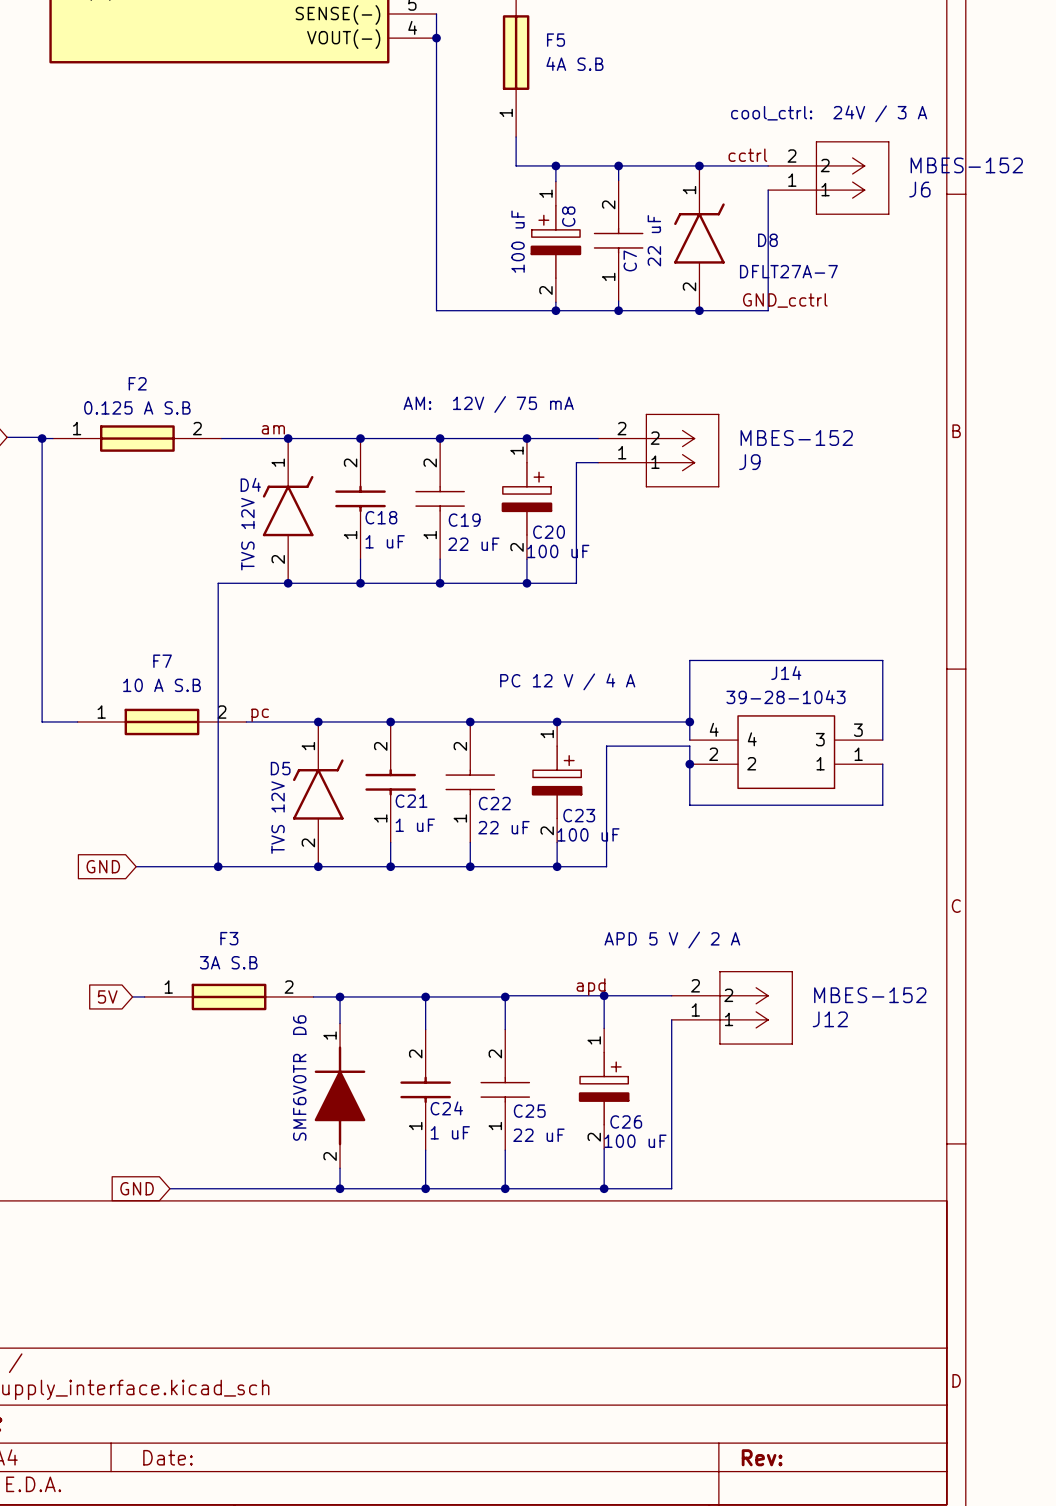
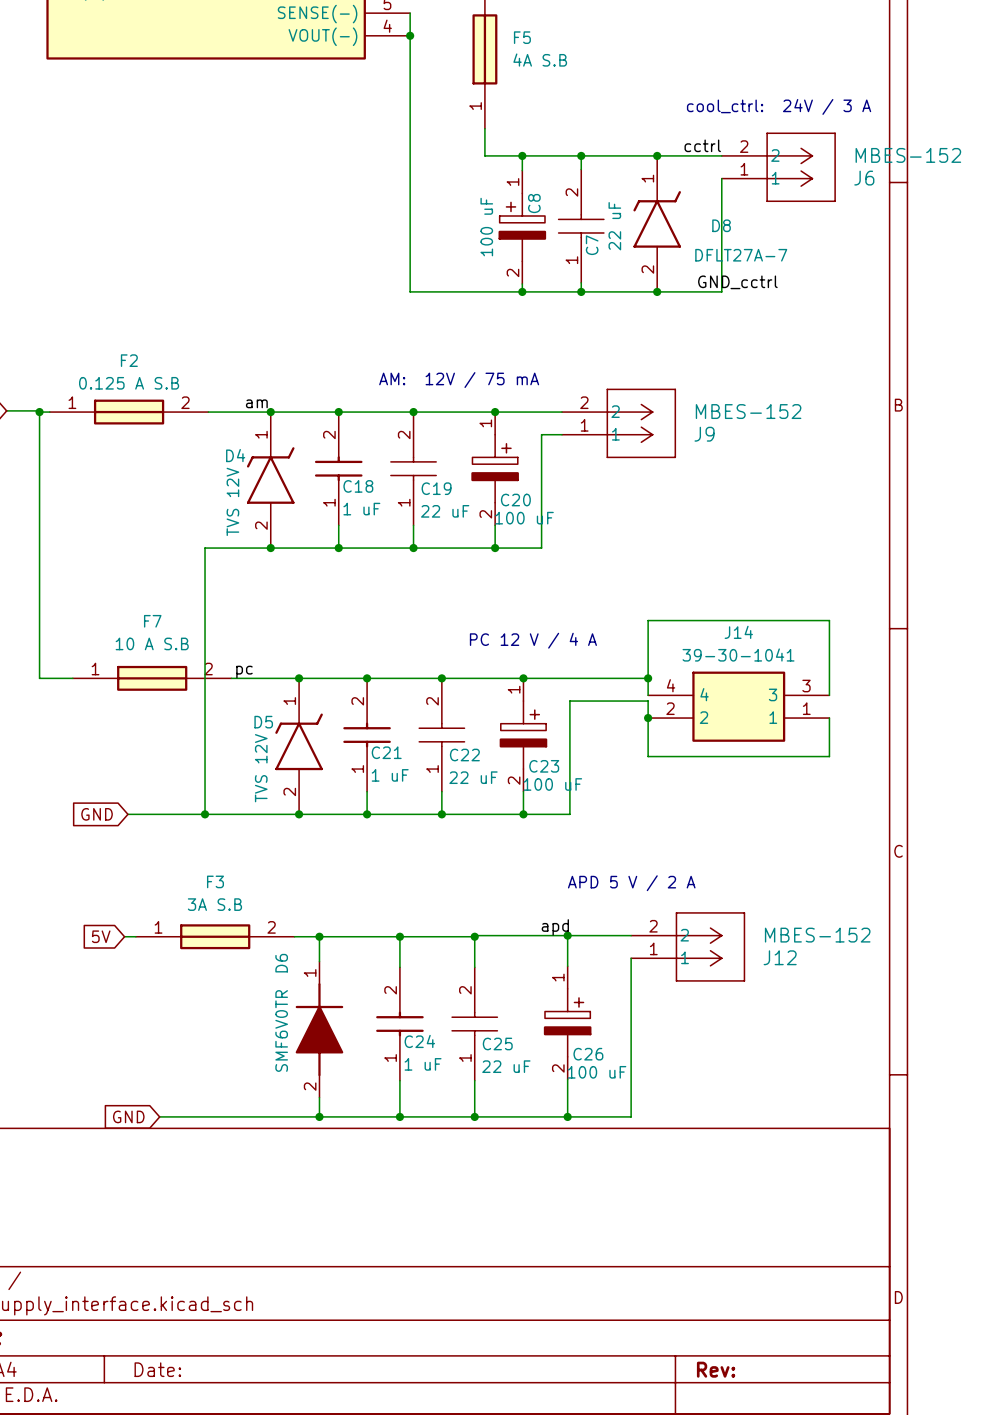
J14 value: 39-28-1043 (785, 697) -> 39-30-1041 (738, 655)
J14 symbol: [689, 715, 883, 790] -> [648, 671, 830, 742]

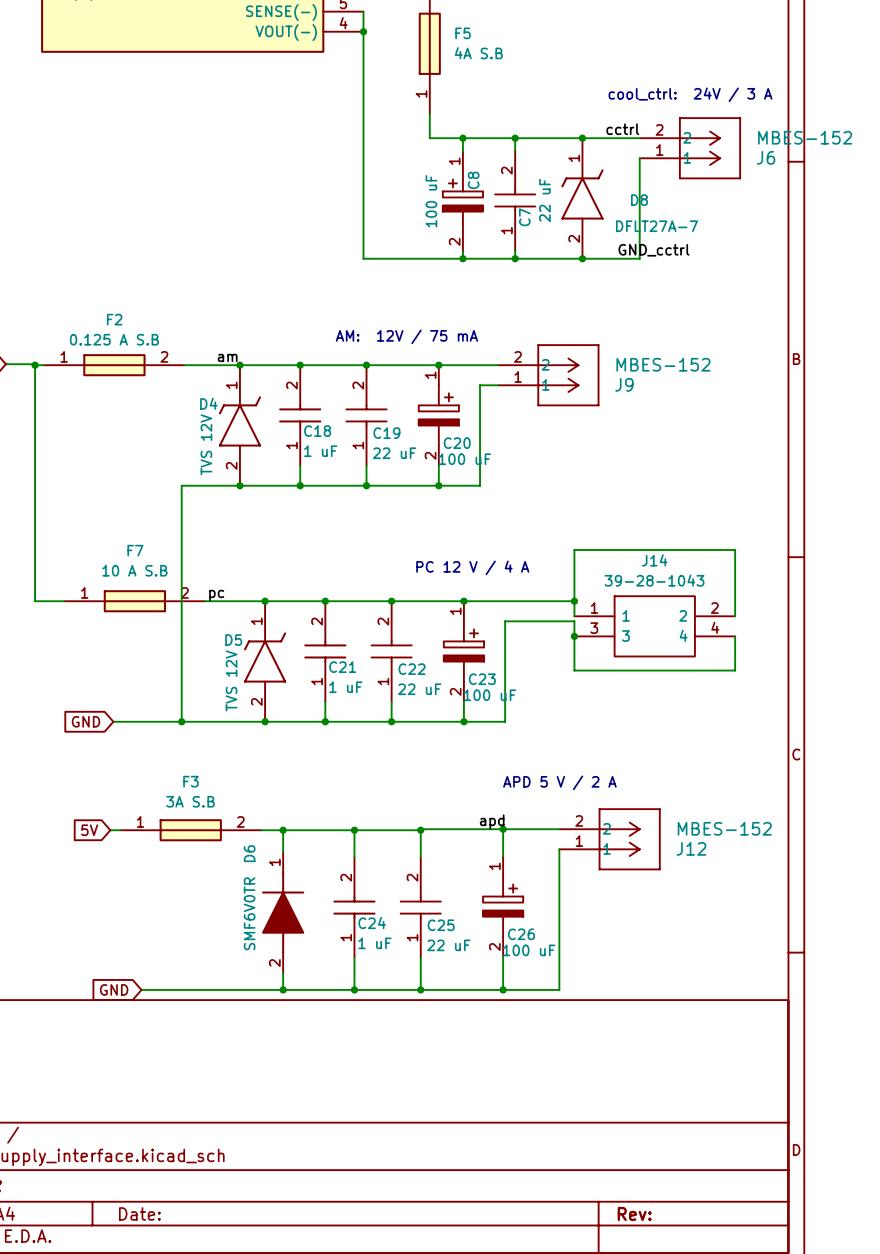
J14 value: 39-30-1041 (738, 655) -> 39-28-1043 (654, 580)
J14 symbol: [648, 671, 830, 742] -> [574, 595, 736, 658]

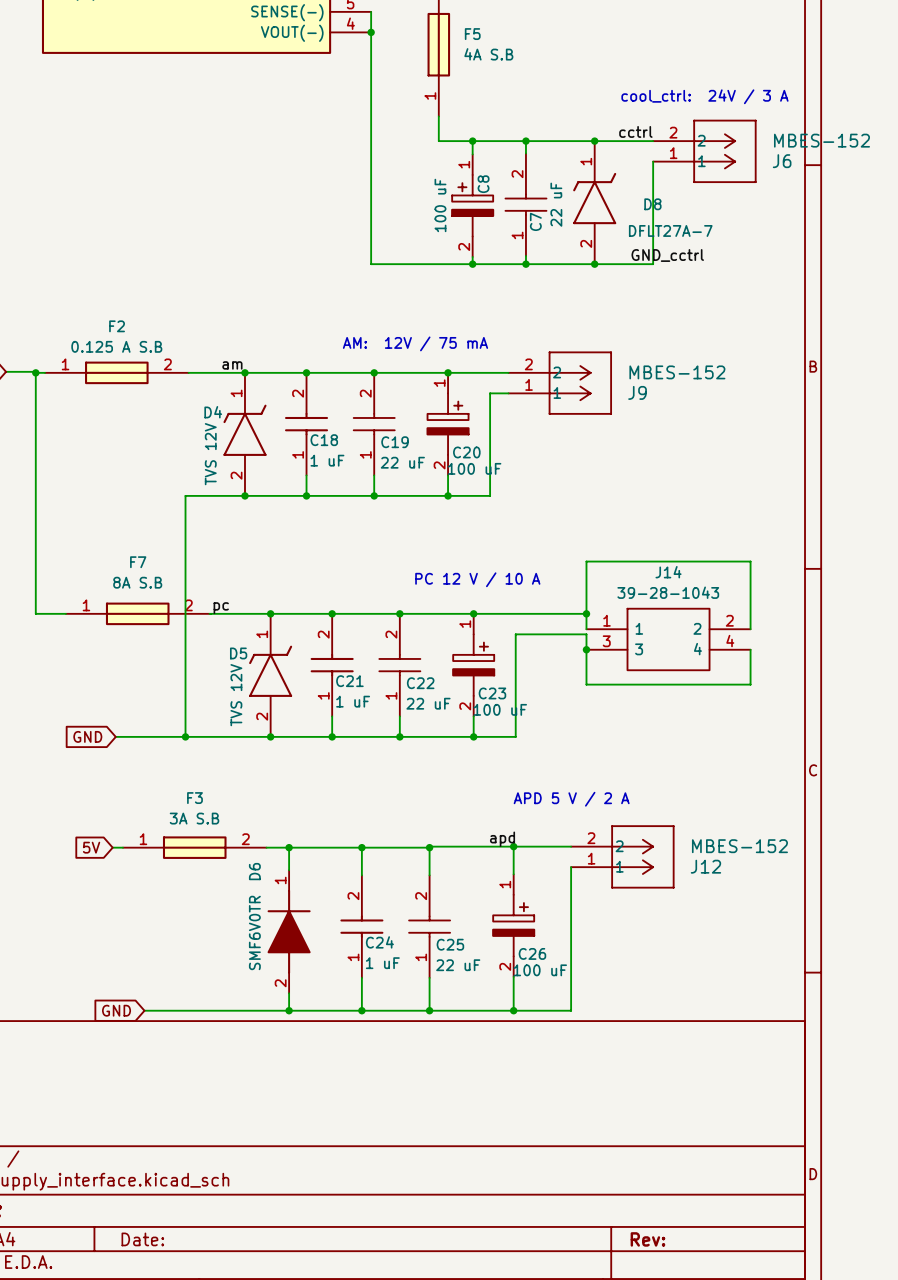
text: PC 12 V / 4 A (472, 567) -> PC 12 V / 10 A (477, 579)
F7 value: 10 A S.B (134, 570) -> 8A S.B (137, 582)

